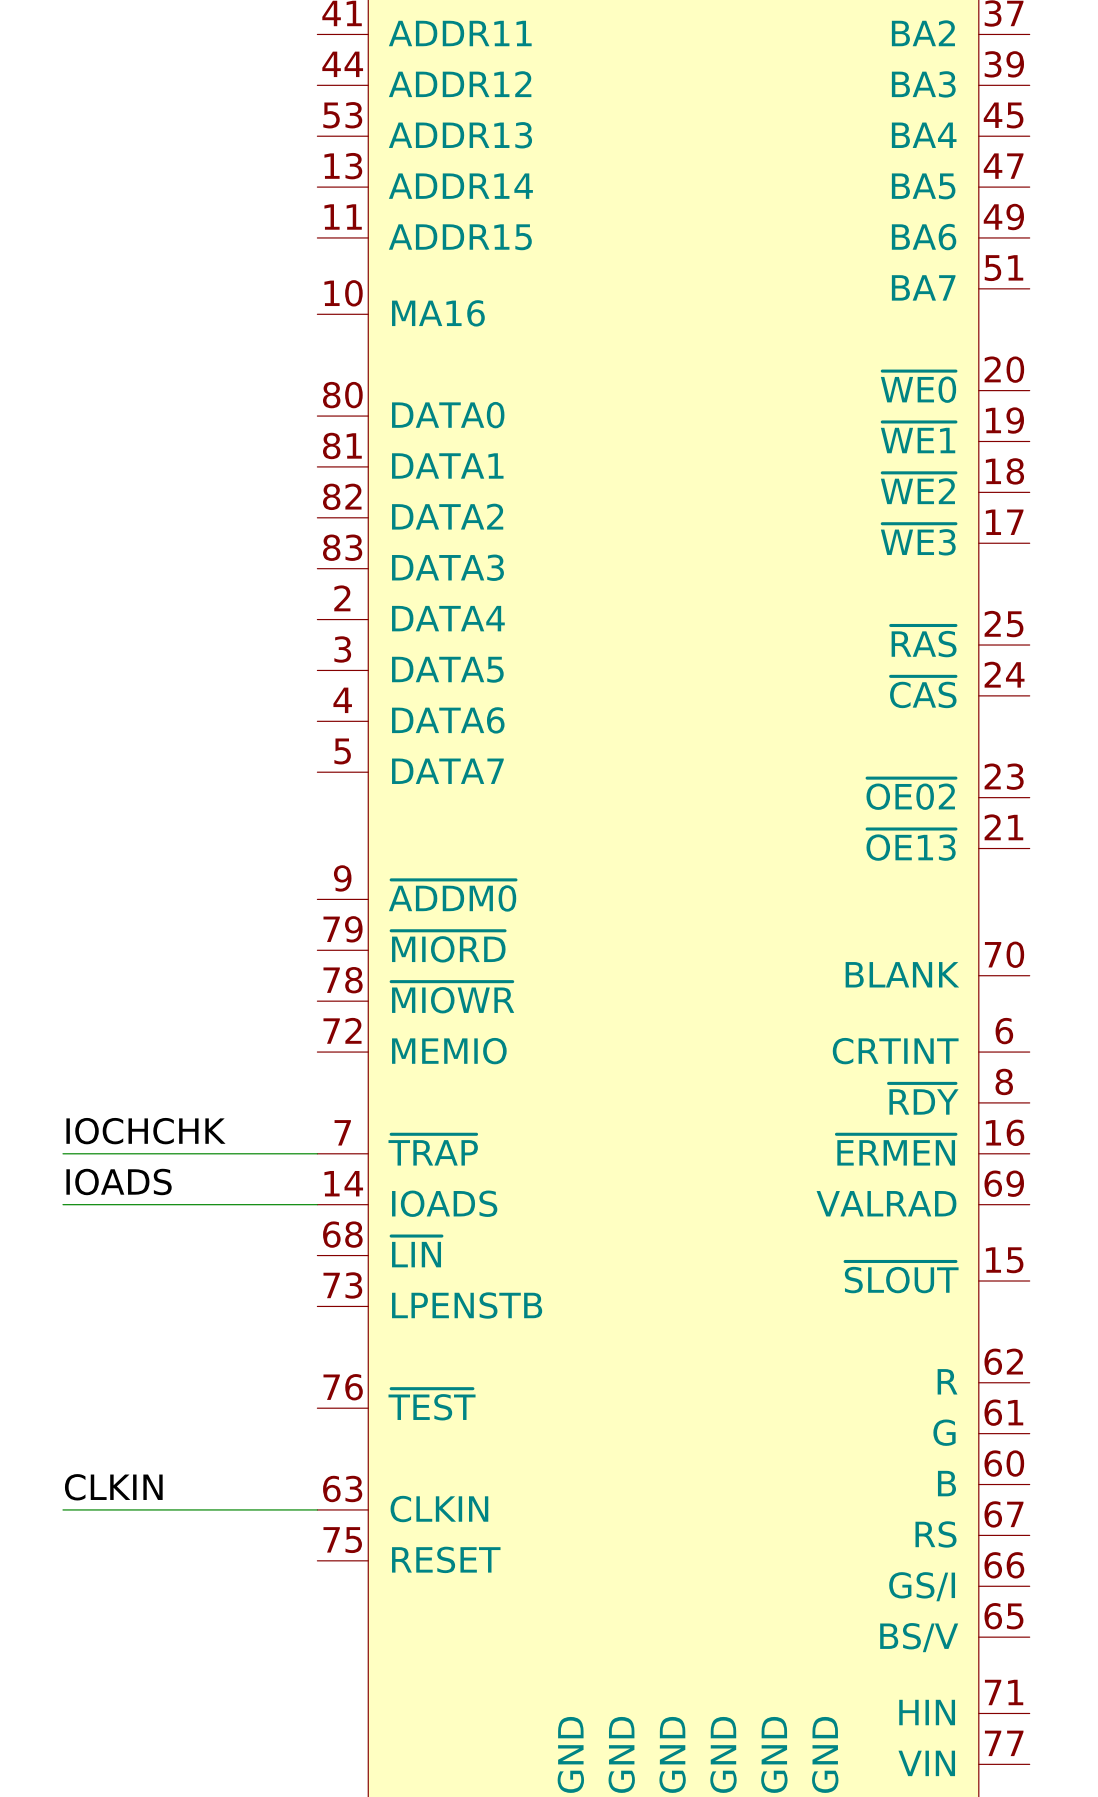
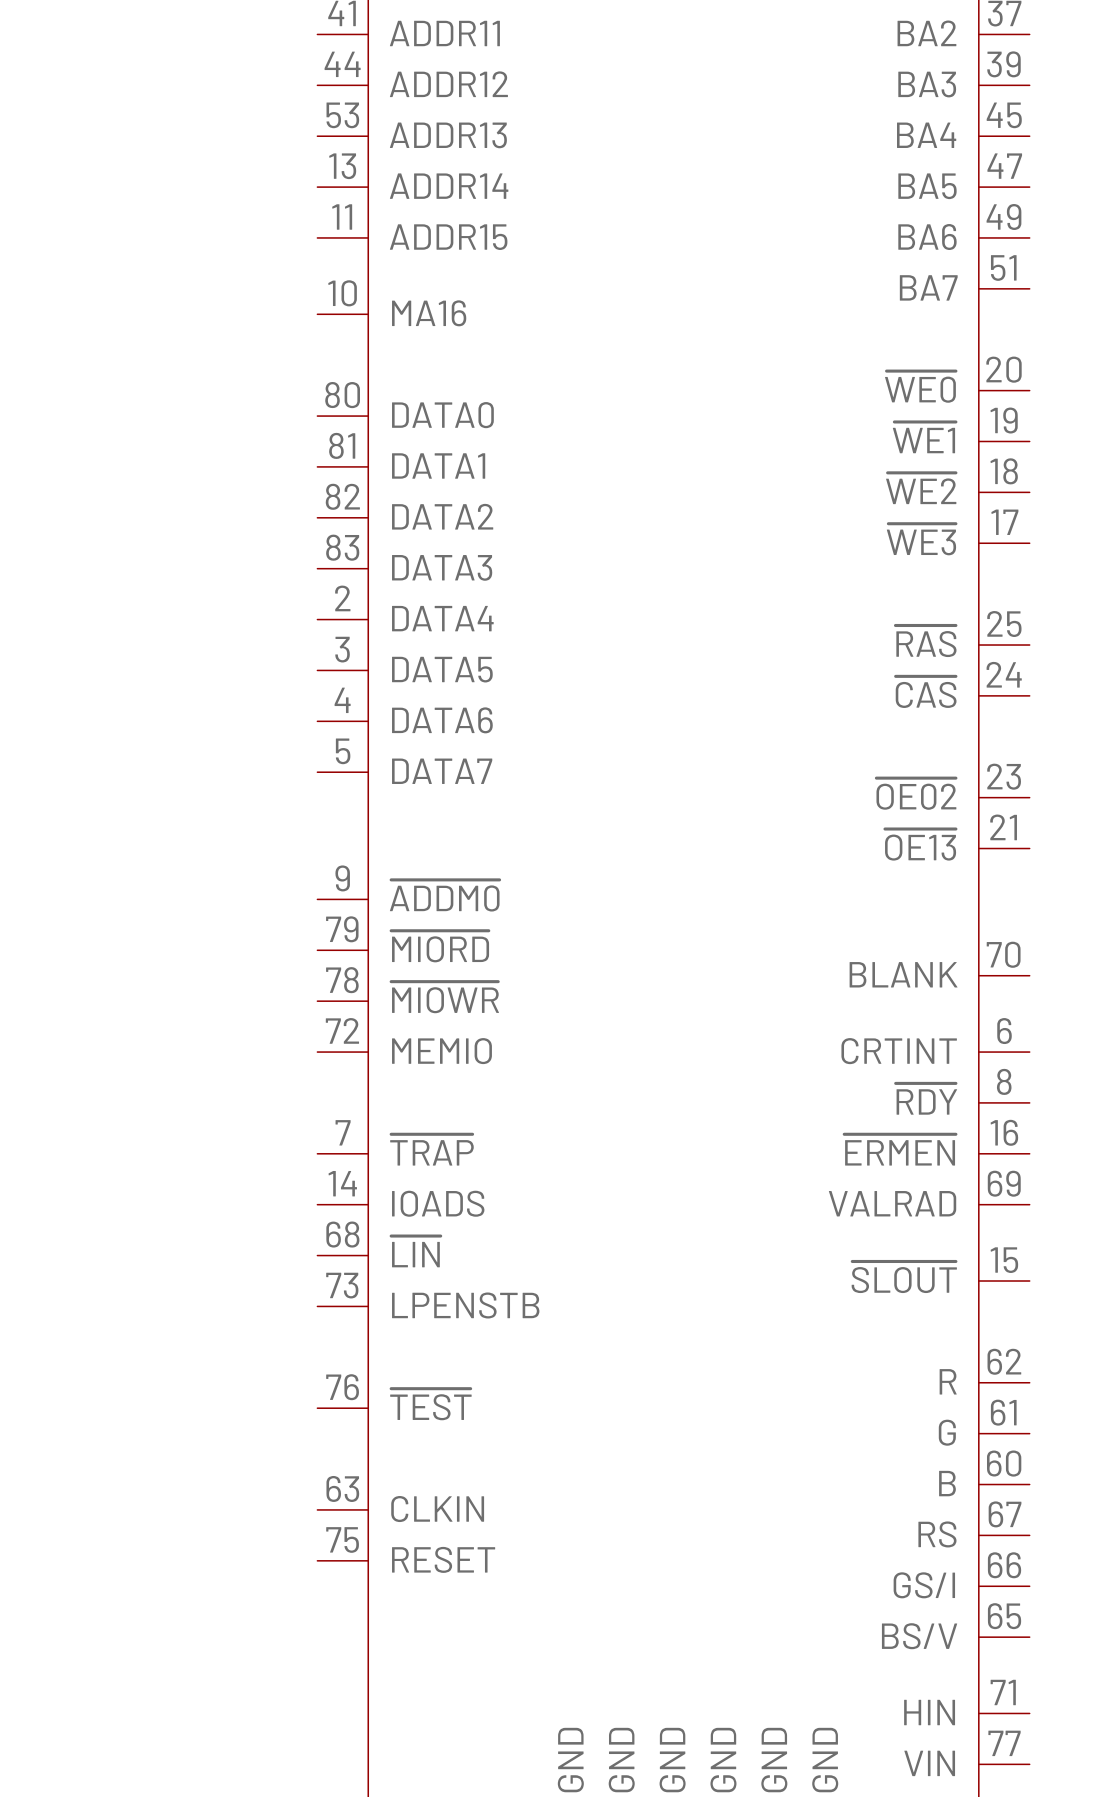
label: IOCHCHK (145, 1131) -> none
wire: (62, 1153) (317, 1153) -> none
label: IOADS (119, 1182) -> none
wire: (62, 1204) (317, 1204) -> none
label: CLKIN (113, 1487) -> none
wire: (62, 1509) (317, 1509) -> none

